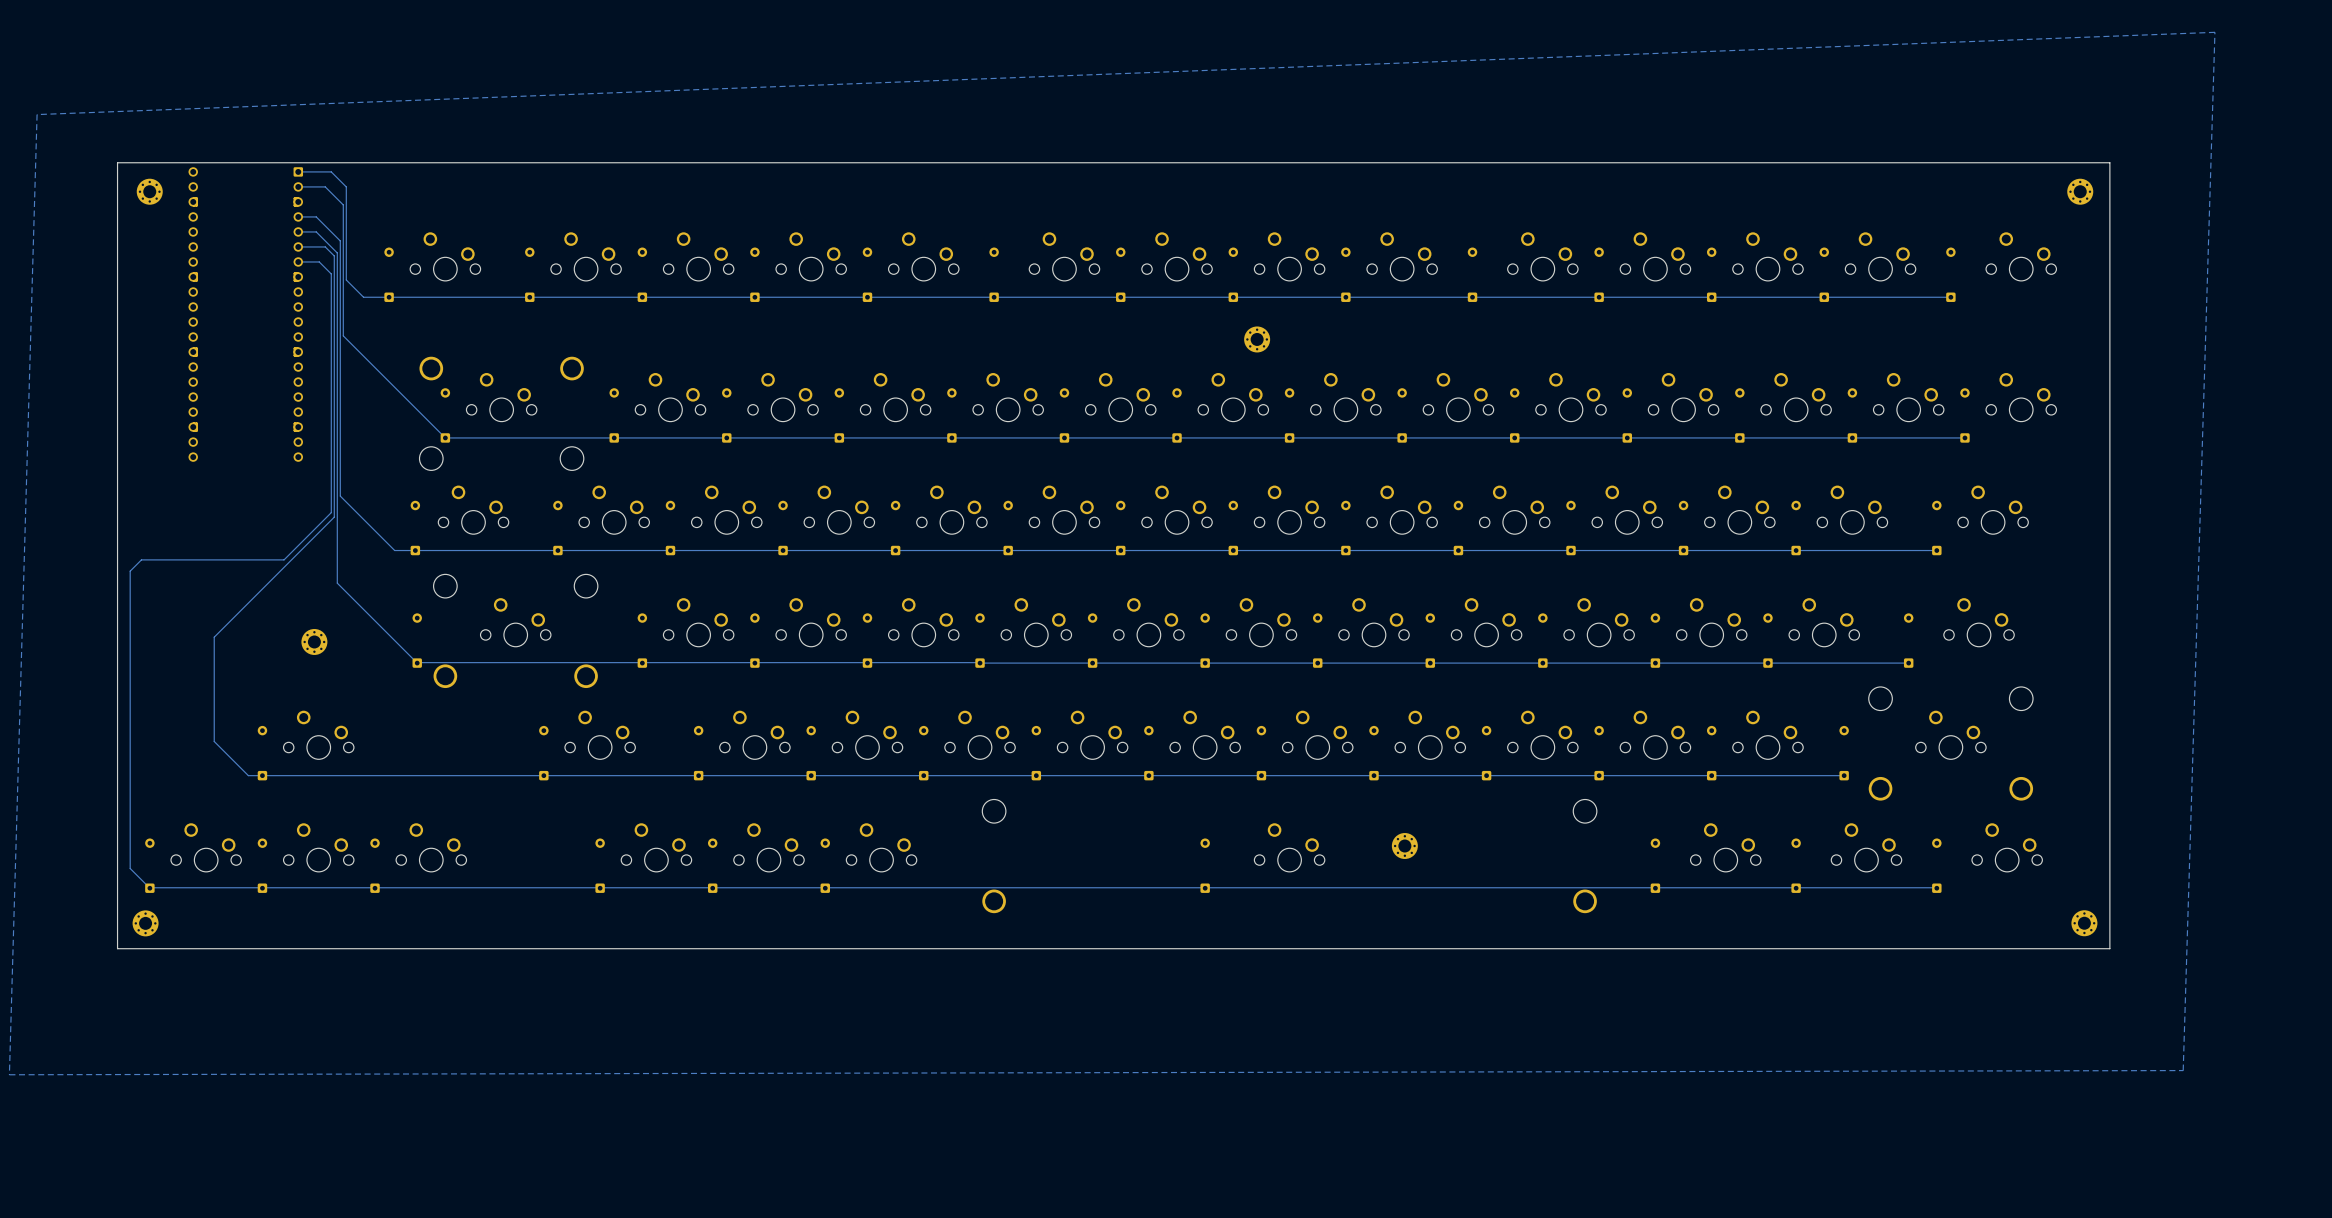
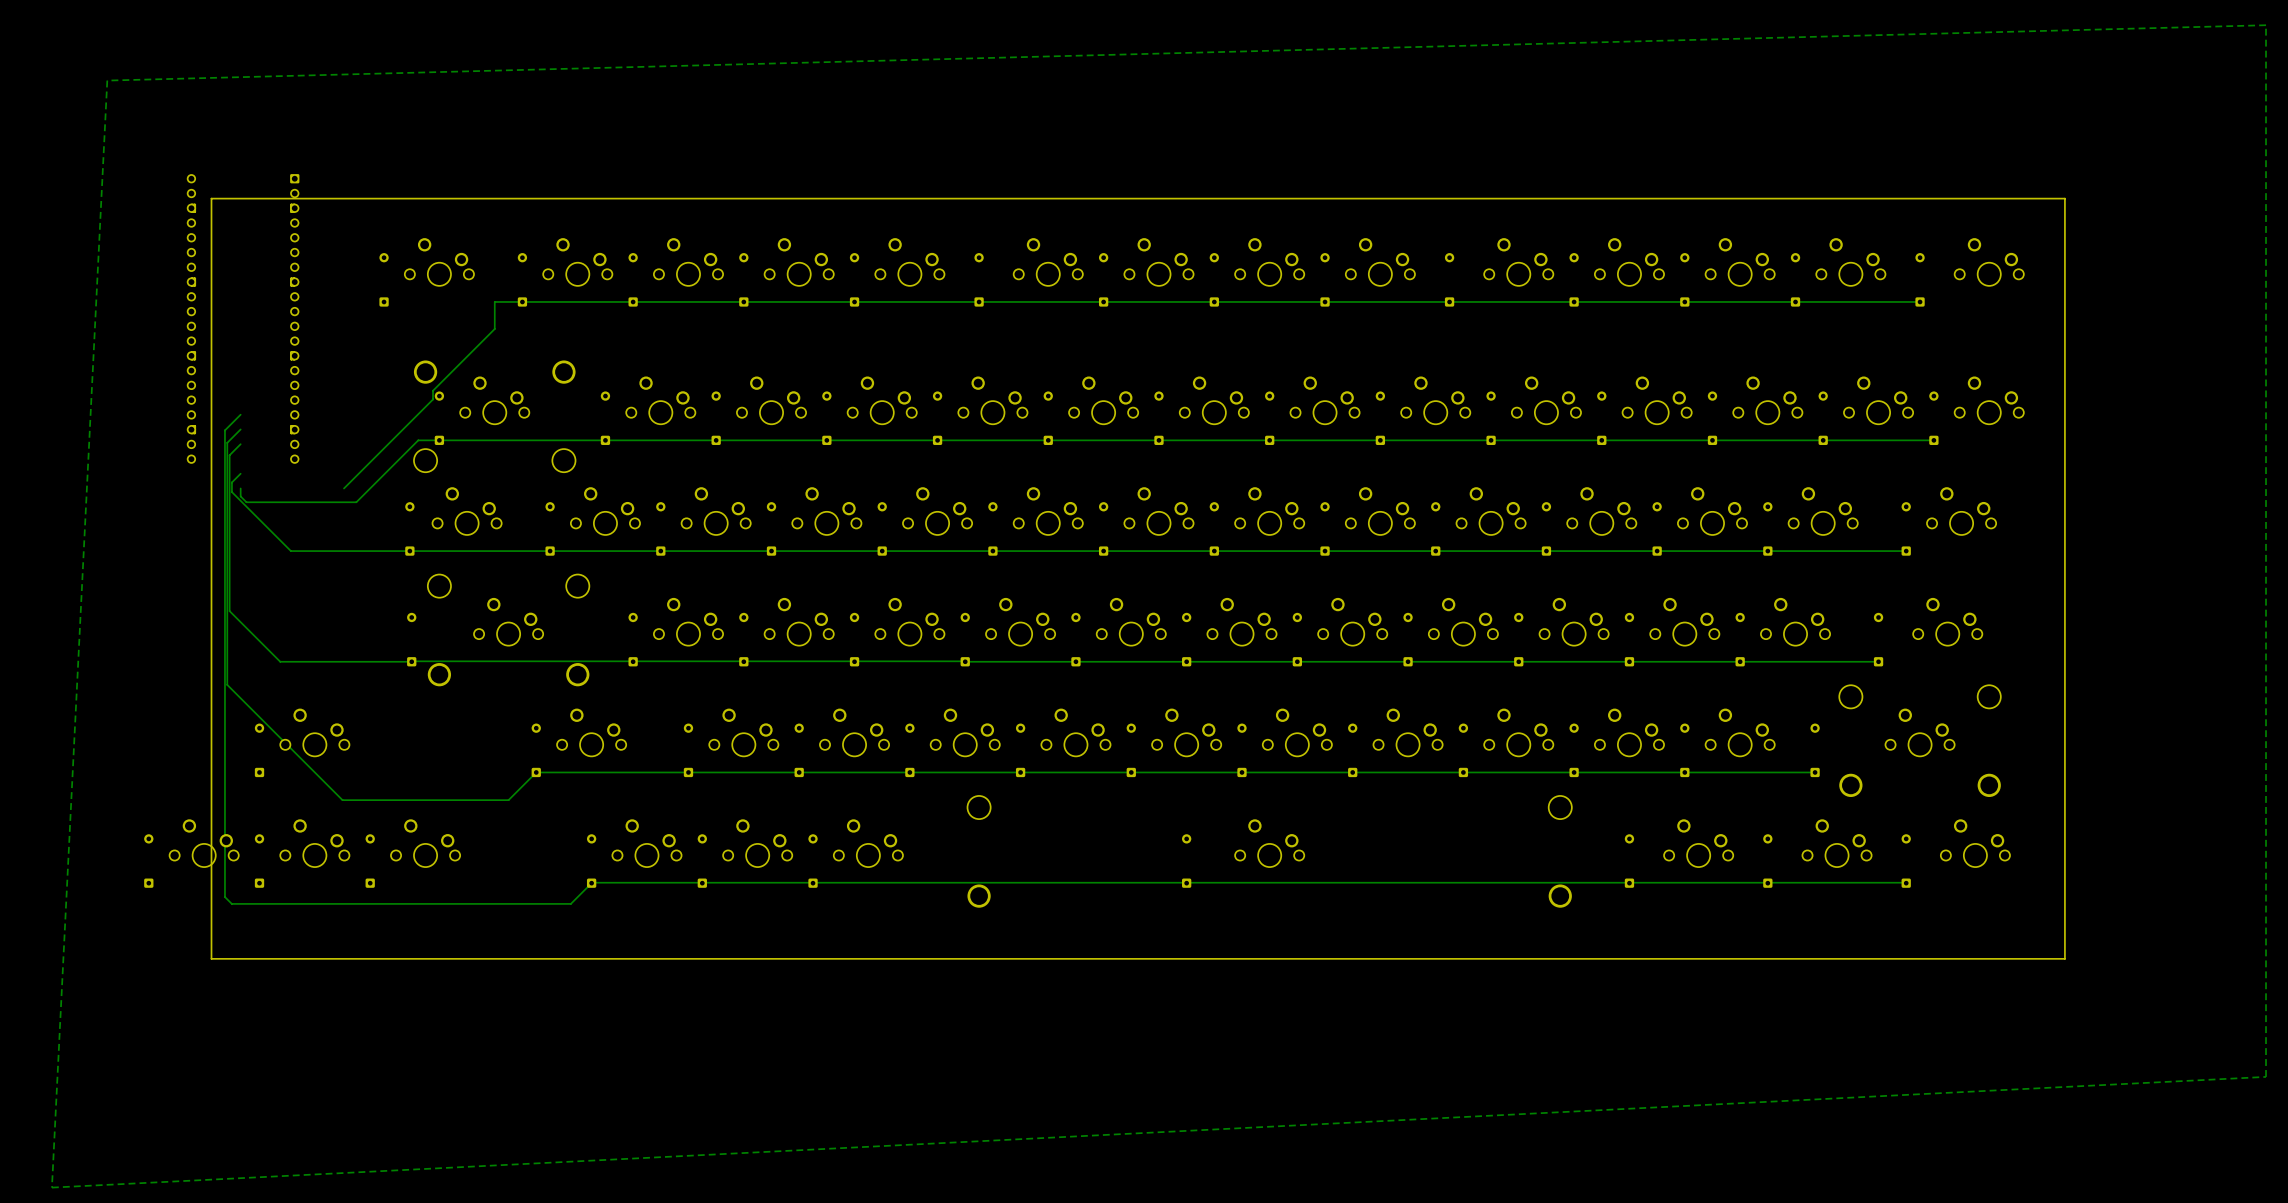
zone outline: (2214, 32) (2183, 1070) (9, 1074) (37, 114) (2214, 32) -> (2266, 25) (2266, 1076) (51, 1187) (107, 80) (2266, 25)
board edge: (2109, 162) (117, 162) (117, 948) (2109, 948) (2109, 162) -> (2064, 198) (2064, 958) (211, 958) (211, 198) (2064, 198)
track: (298, 171) (331, 171) (346, 186) (346, 279) (363, 297) (501, 297) -> (343, 488) (433, 399) (433, 390) (494, 329) (494, 301)
track: (298, 186) (325, 186) (343, 204) (343, 335) (445, 439) -> none
part: (149, 191) -> none
part: (2080, 191) -> none
track: (298, 216) (316, 216) (340, 240) (340, 496) (394, 550) -> (240, 473) (231, 482) (231, 492) (290, 551) (389, 551)
track: (298, 231) (316, 231) (337, 252) (337, 583) (417, 663) -> (240, 444) (229, 455) (229, 611) (280, 661) (411, 661)
track: (298, 246) (325, 246) (334, 255) (334, 517) (214, 637) (214, 741) (248, 775) (543, 775) -> (240, 429) (227, 442) (227, 684) (342, 800) (508, 800) (536, 772)
track: (298, 261) (319, 261) (331, 273) (331, 512) (284, 559) (141, 559) (130, 571) (130, 868) (149, 888) (600, 887) -> (240, 414) (224, 430) (224, 897) (231, 903) (570, 903) (592, 882)
part: (1257, 339) -> none
track: none -> (439, 440) (418, 440) (356, 502) (246, 502) (240, 496) (240, 488)
part: (314, 641) -> none
part: (1404, 846) -> none
part: (145, 923) -> none
part: (2084, 923) -> none

